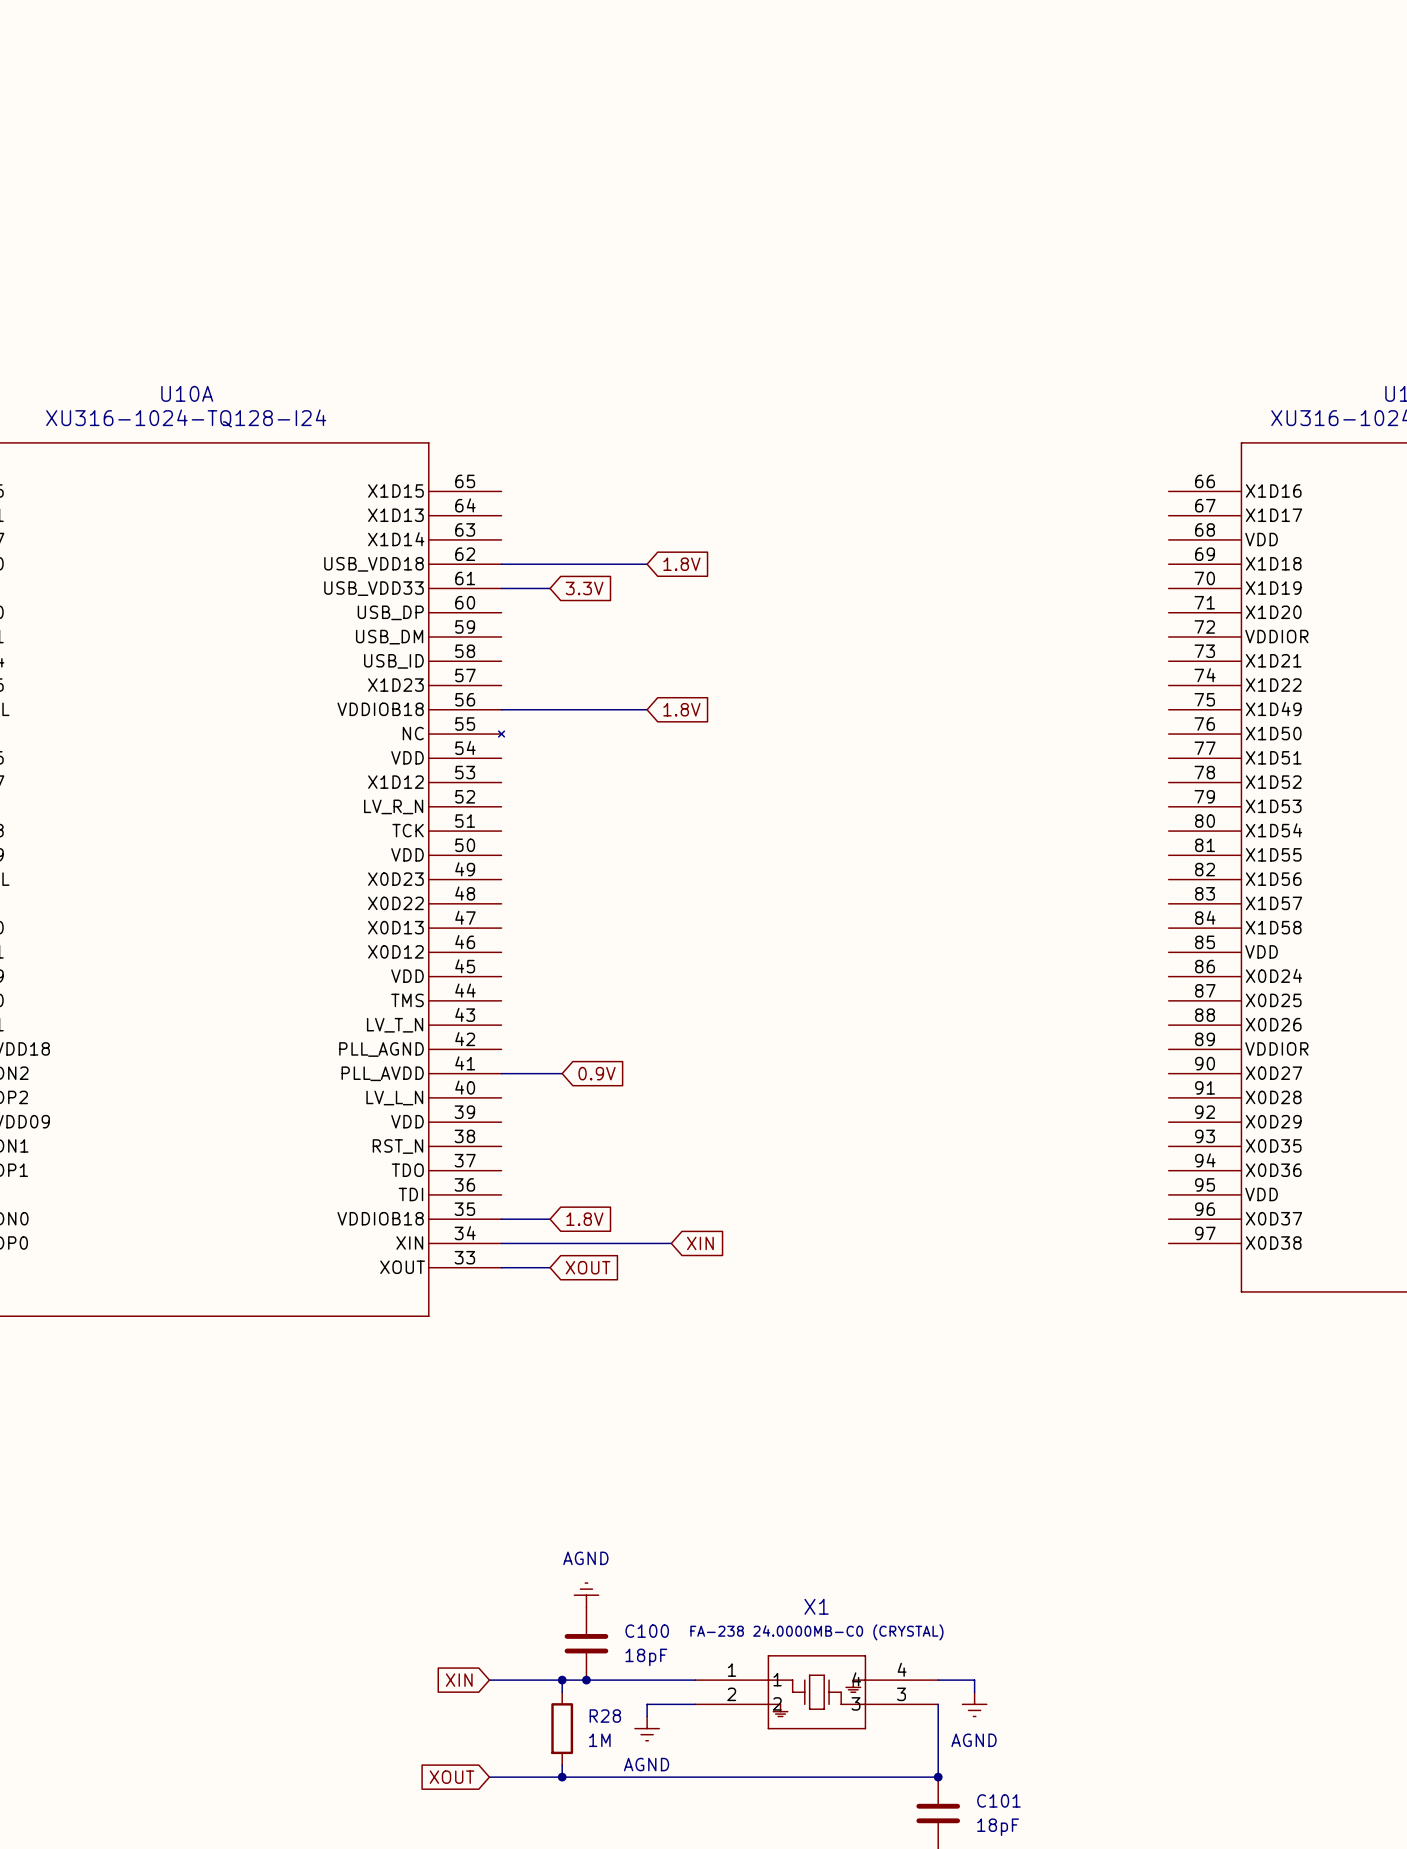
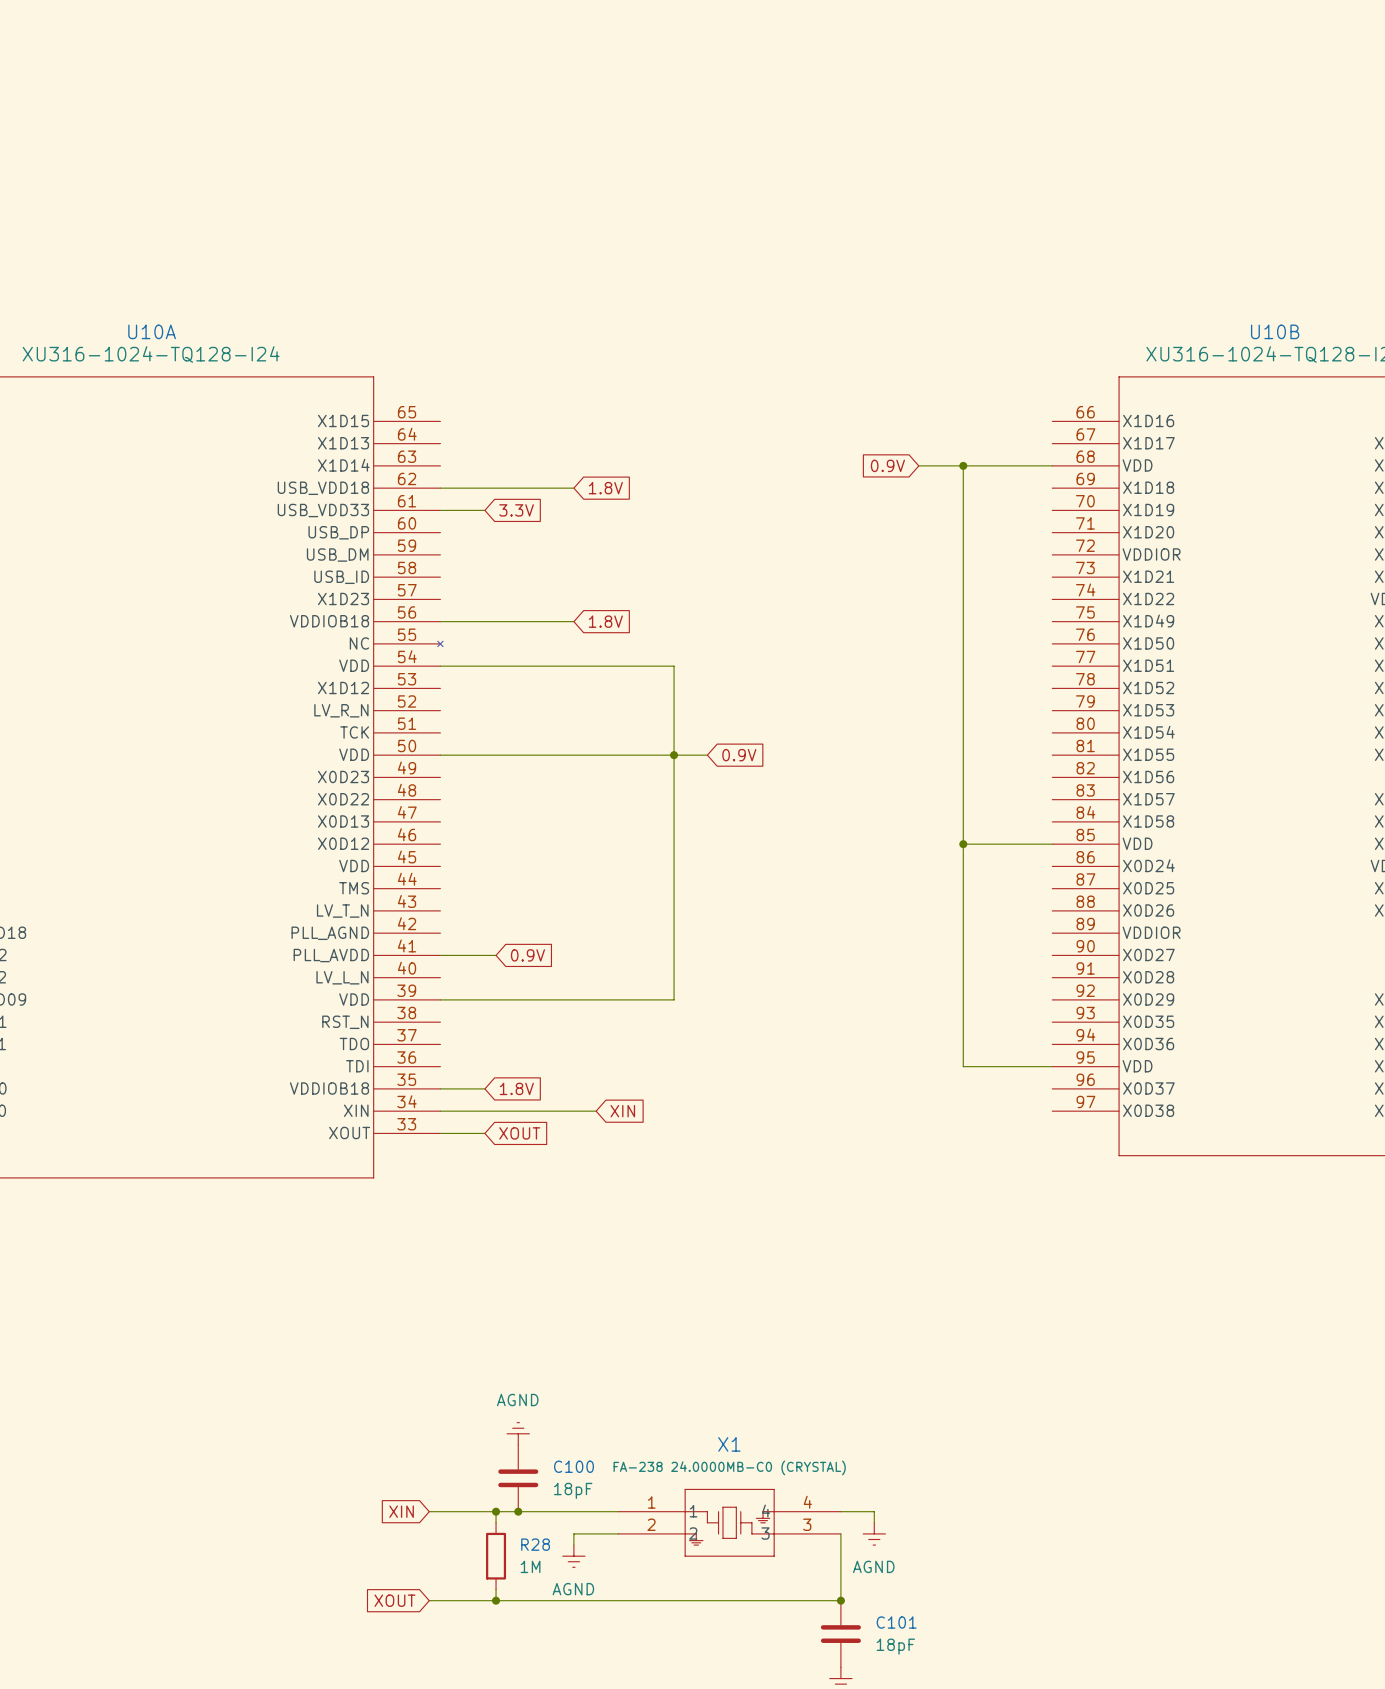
global label: none -> 0.9V (887, 465)
wire: none -> (918, 465) (1052, 465)
wire: none -> (963, 465) (963, 1066) (1052, 1066)
junction: none -> (963, 465)
wire: none -> (440, 666) (674, 666) (674, 999) (440, 999)
wire: none -> (440, 755) (707, 755)
junction: none -> (674, 755)
global label: none -> 0.9V (739, 755)
wire: none -> (963, 844) (1052, 844)
junction: none -> (963, 844)

